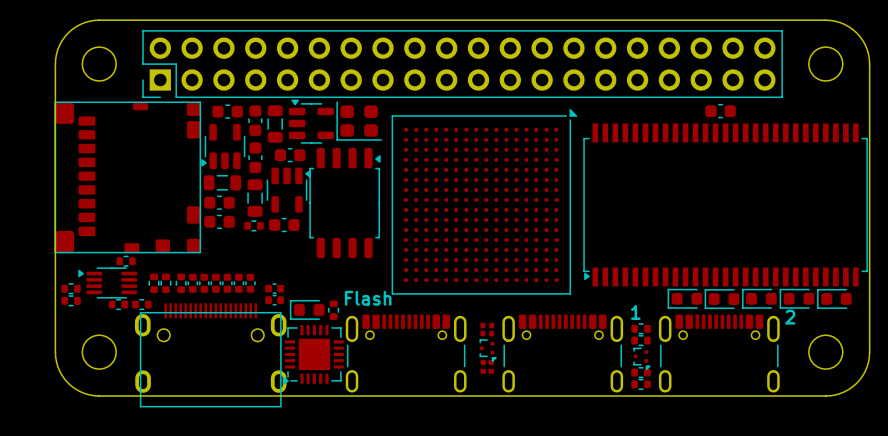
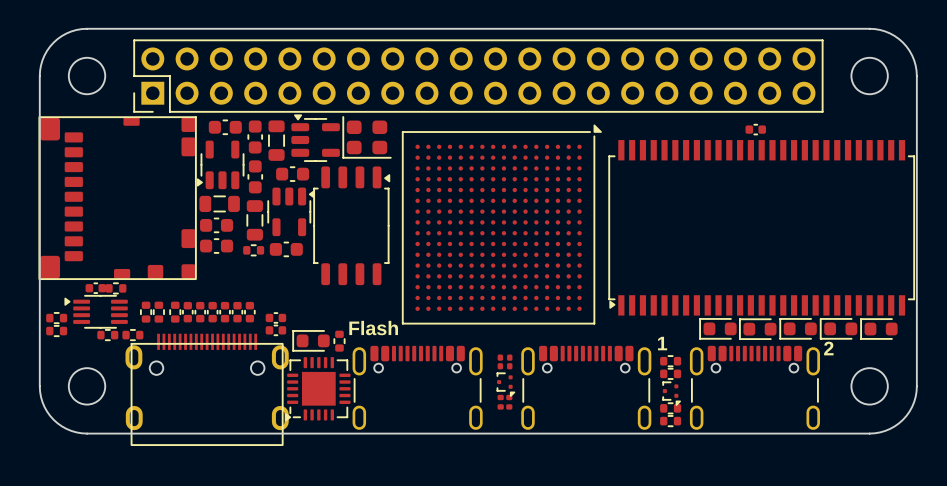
part footprint: [705, 104, 736, 119] -> [745, 123, 767, 136]
part: none -> (95, 288)

